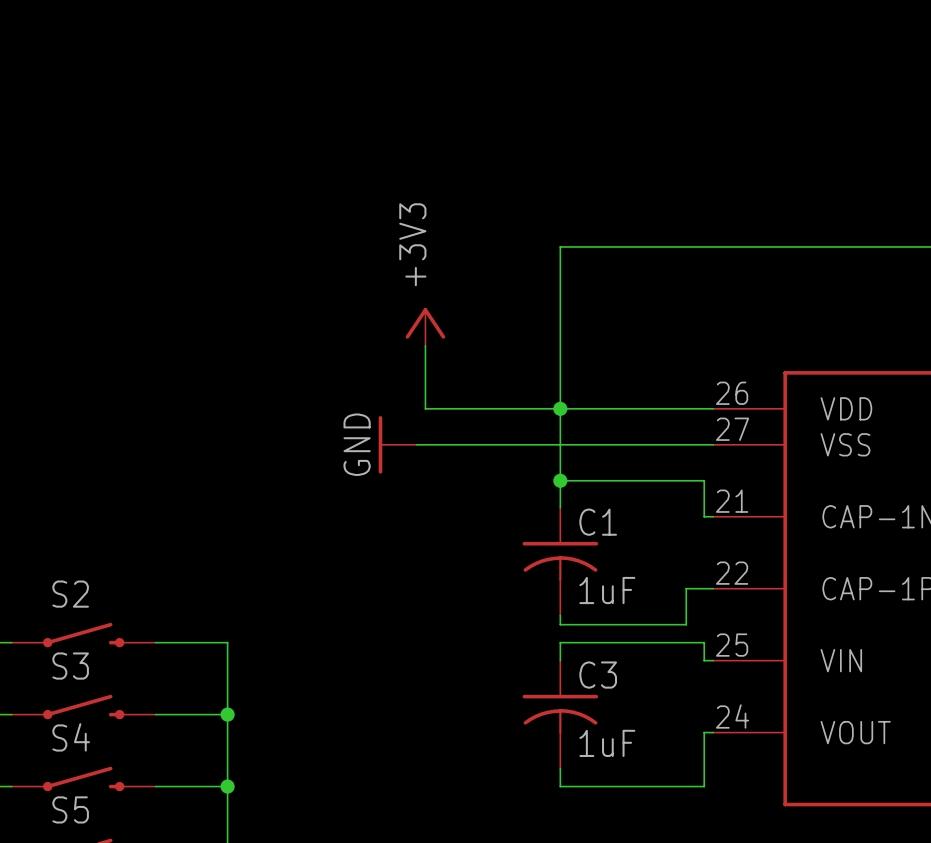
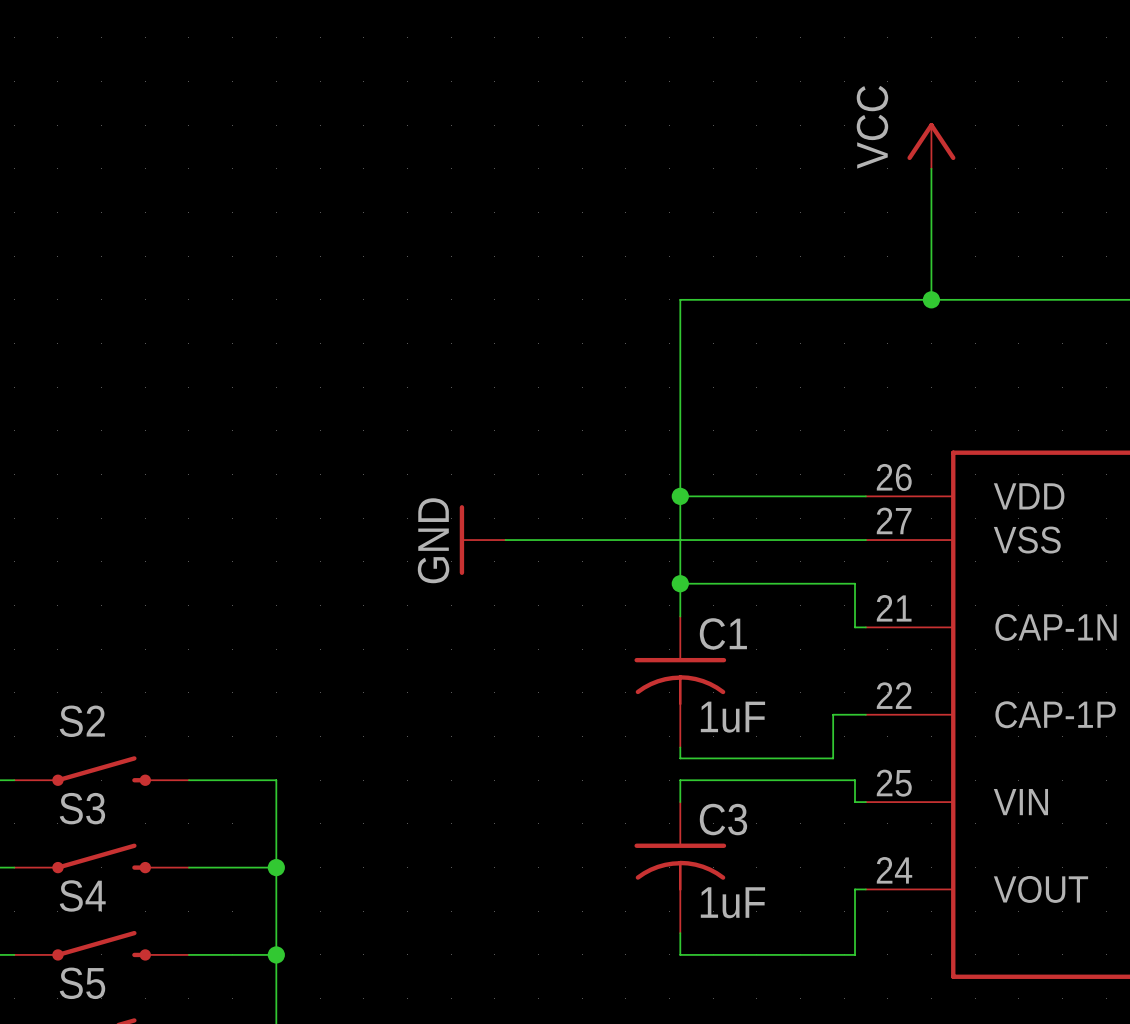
power symbol: none -> VCC (931, 145)
wire: none -> (931, 168) (931, 299)
junction: none -> (931, 299)
power symbol: +3V3 (425, 327) -> none
wire: (425, 345) (425, 408) (560, 408) -> none

